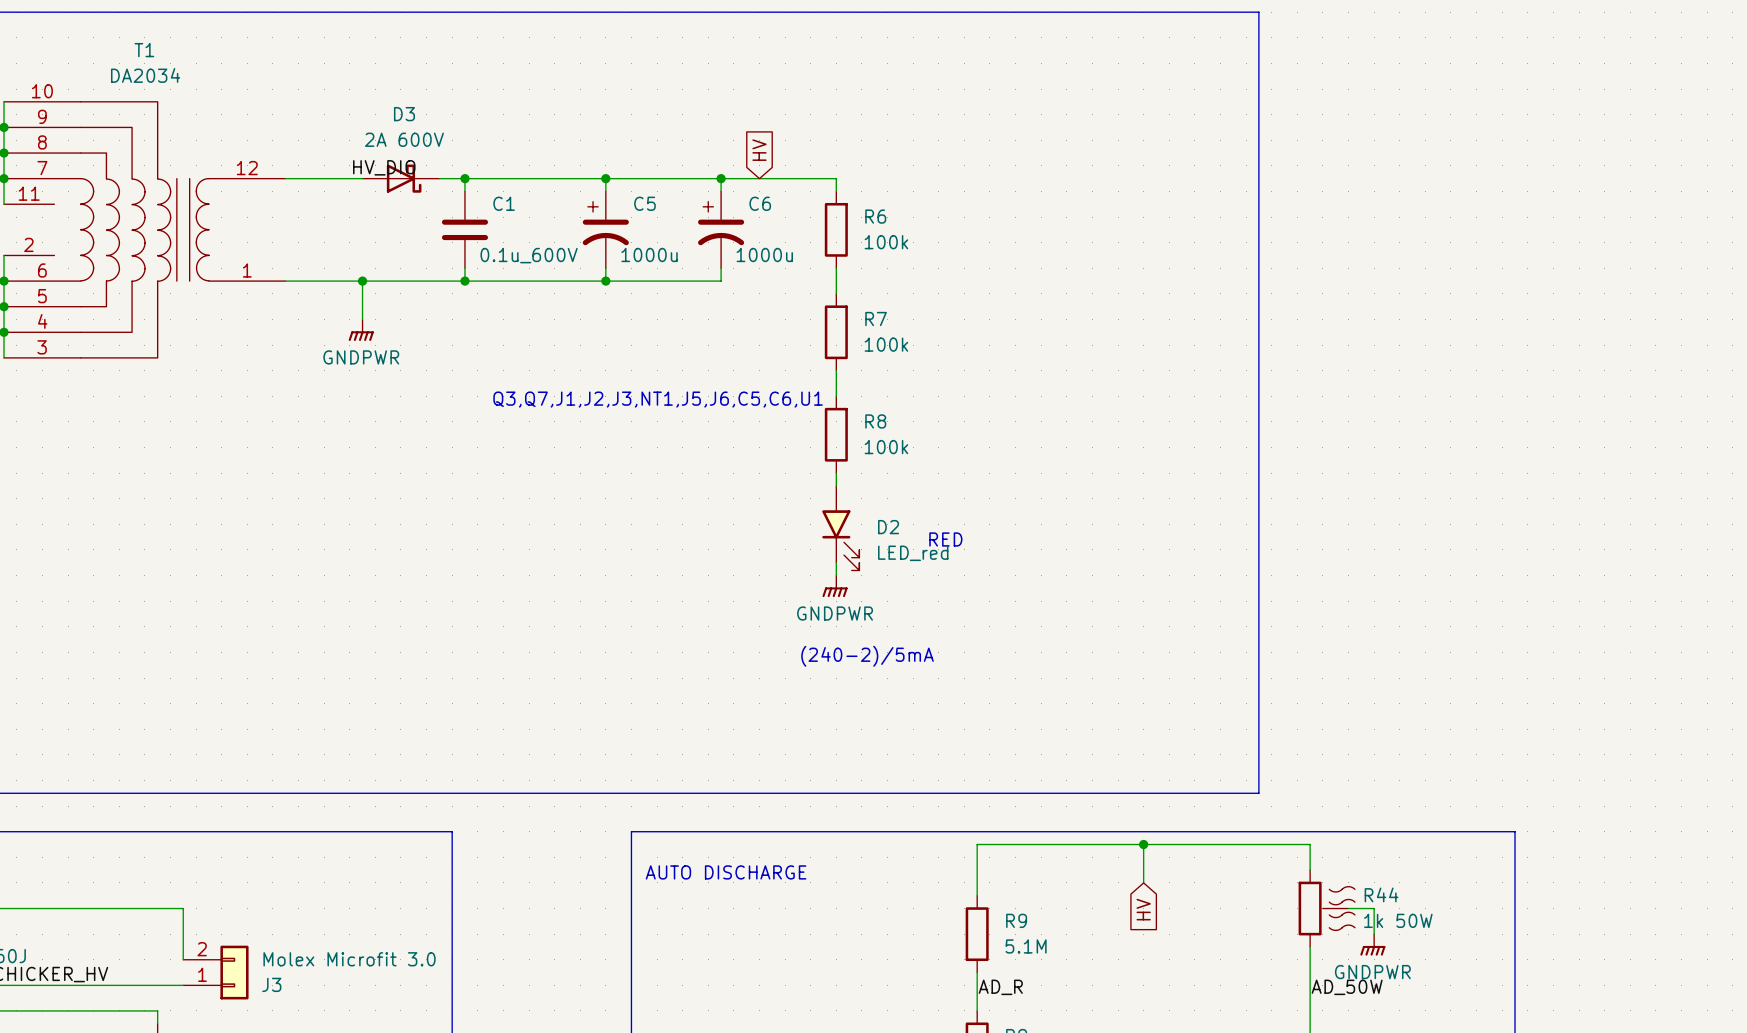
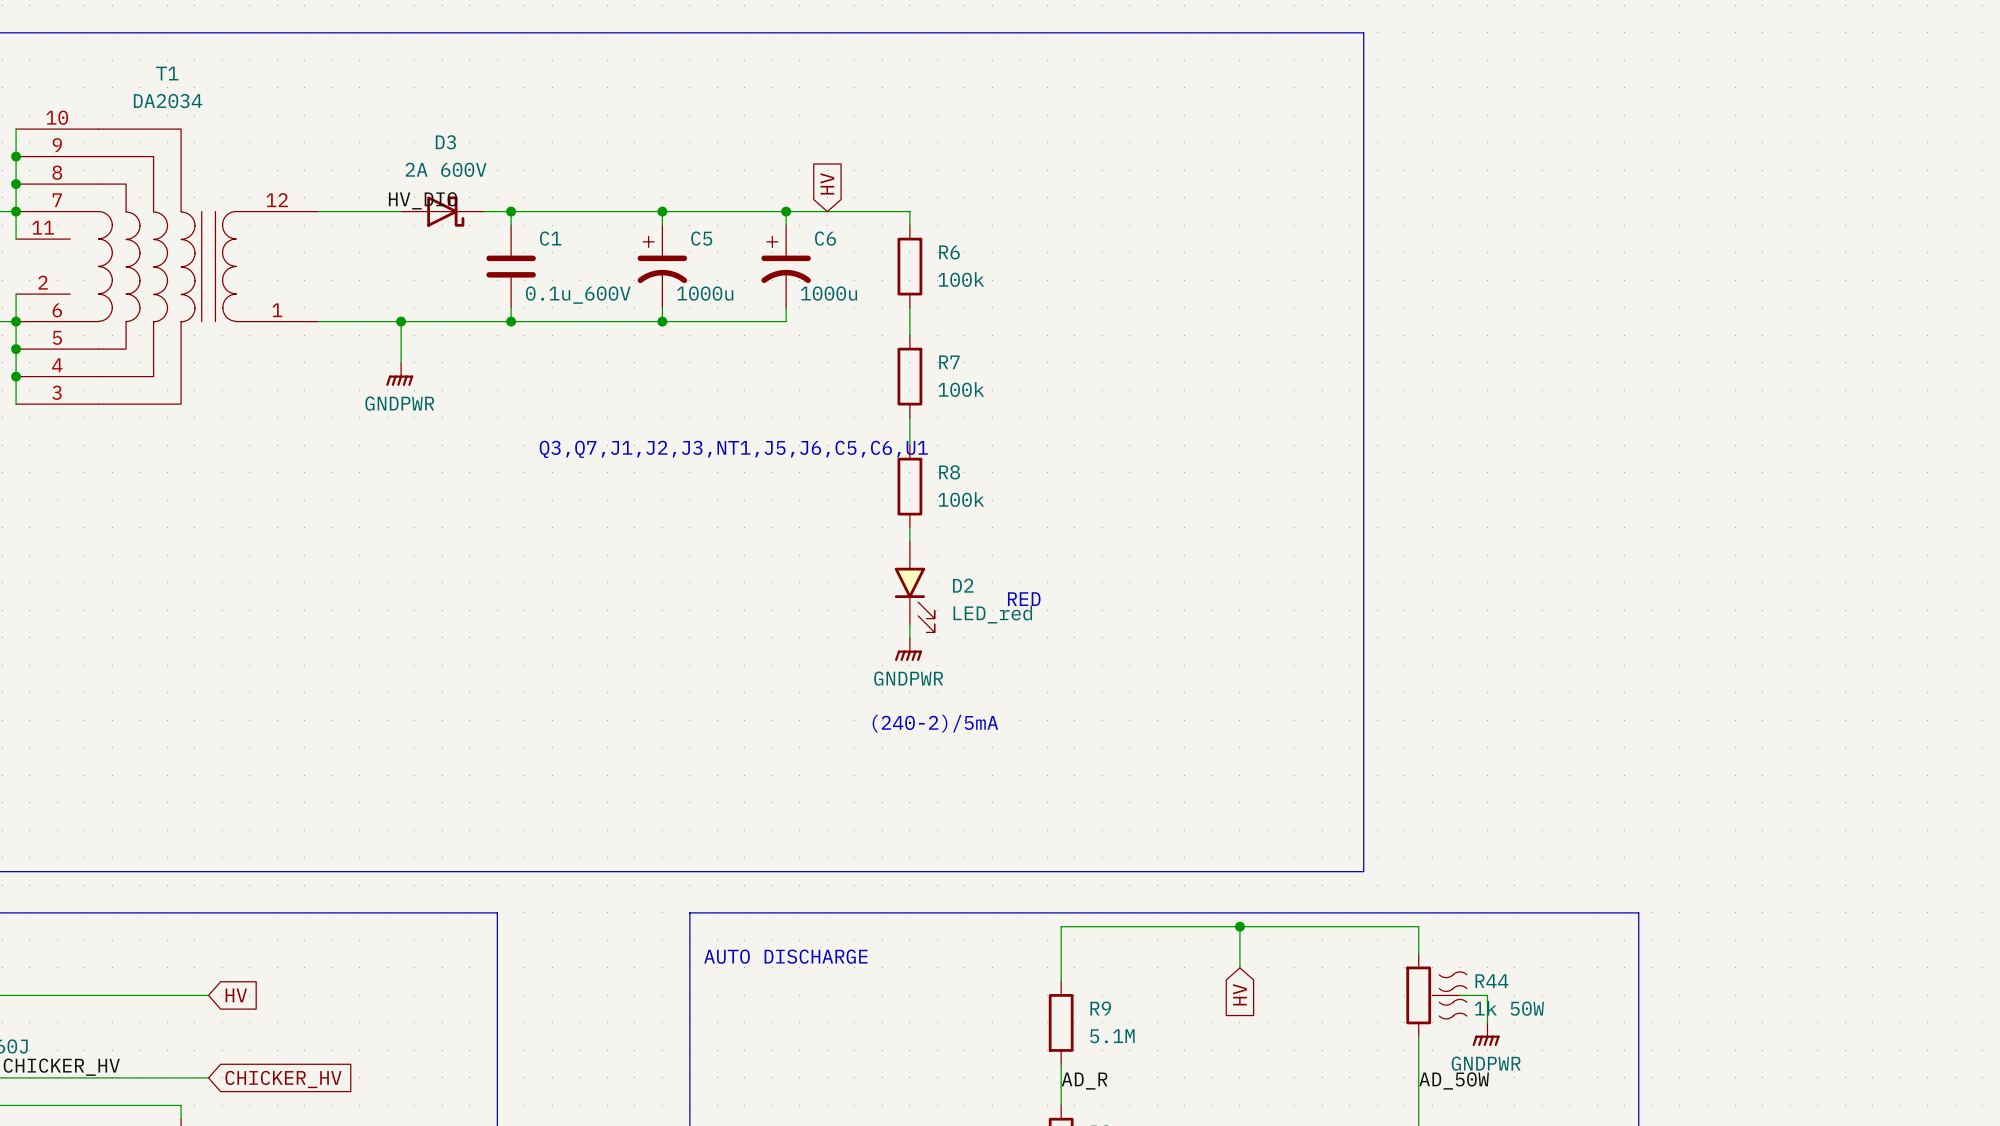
wire: (183, 908) (183, 959) -> none
global label: none -> HV (236, 995)
J3: Molex Microfit 3.0 (215, 972) -> none
global label: none -> CHICKER_HV (283, 1079)

